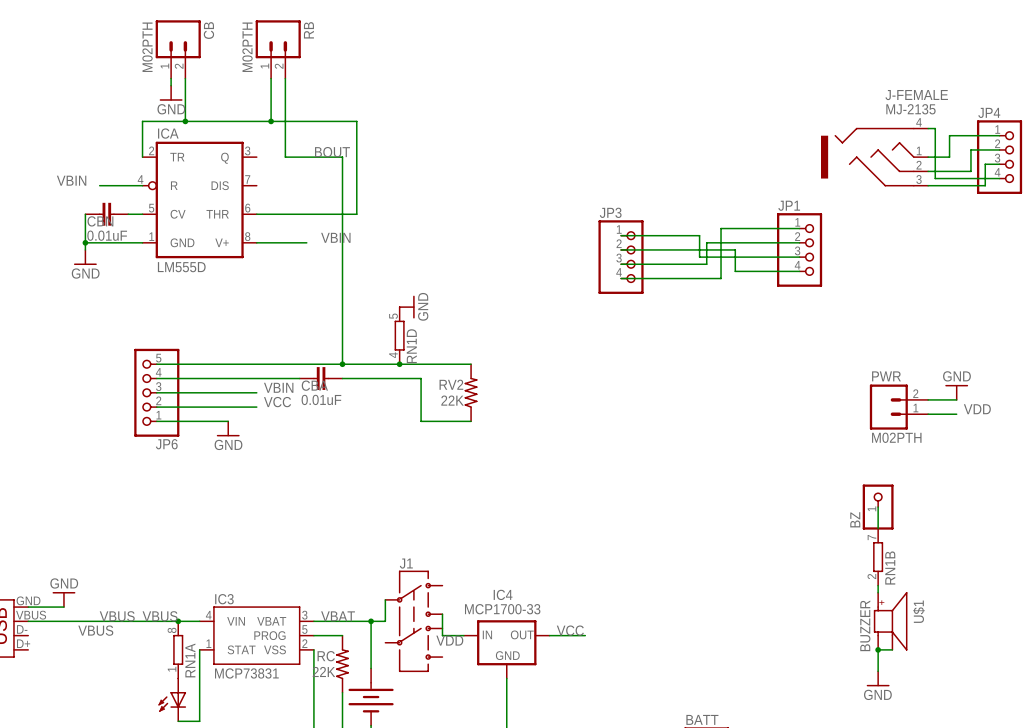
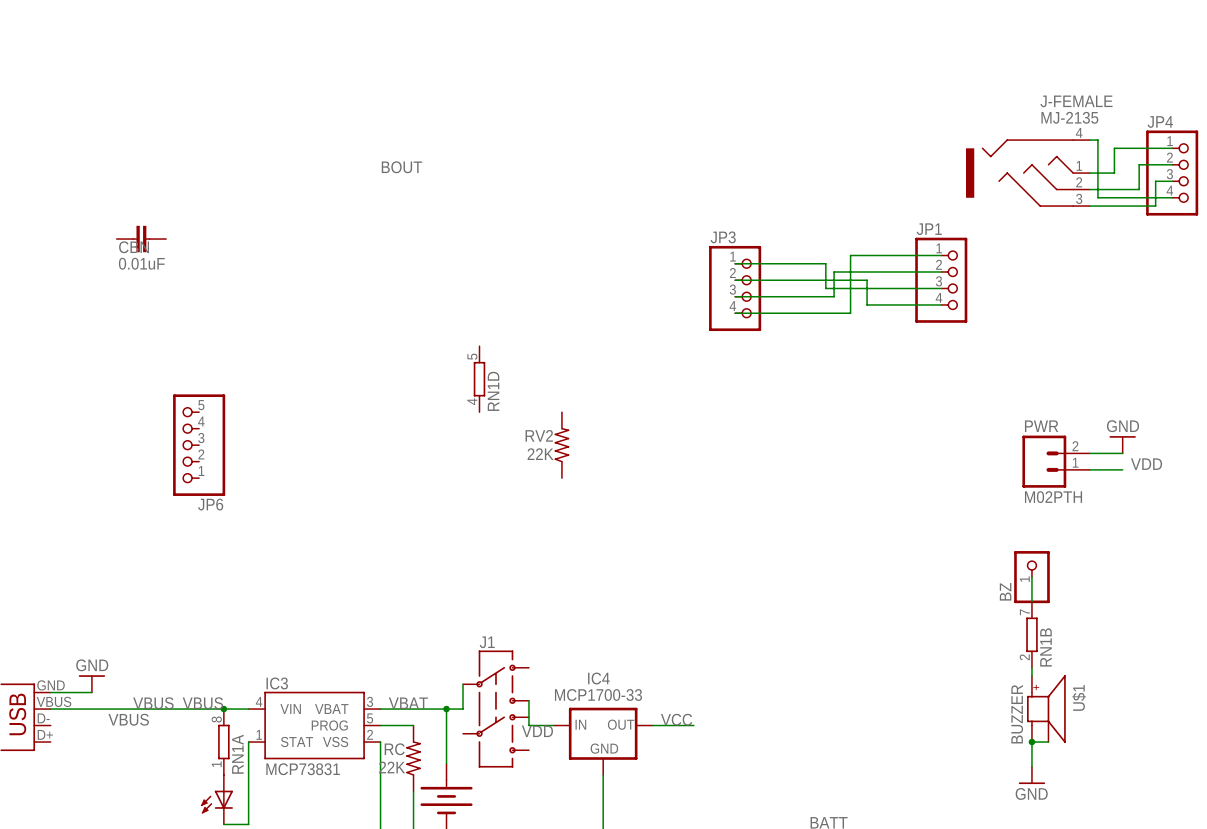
CB: M02PTH (178, 49) -> none
RB: M02PTH (278, 49) -> none
wire: (171, 78) (171, 85) -> none
wire: (185, 78) (185, 121) -> none
wire: (271, 78) (271, 121) -> none
wire: (285, 78) (285, 157) (342, 157) (342, 364) -> none
power symbol: GND (171, 93) -> none
junction: (185, 121) -> none
junction: (271, 121) -> none
wire: (142, 157) (142, 121) (356, 121) (356, 214) (256, 214) -> none
label: VBIN (71, 180) -> none
wire: (99, 185) (142, 185) -> none
ICA: LM555D (199, 199) -> none
wire: (85, 214) (85, 249) -> none
wire: (128, 214) (142, 214) -> none
label: VBIN (335, 237) -> none
wire: (85, 242) (142, 242) -> none
junction: (85, 242) -> none
wire: (256, 242) (306, 242) -> none
power symbol: GND (85, 257) -> none
power symbol: GND (407, 307) -> none
wire: (156, 364) (471, 364) -> none
junction: (342, 364) -> none
junction: (399, 364) -> none
wire: (156, 378) (299, 378) -> none
CBA: 0.01uF (321, 378) -> none
wire: (342, 378) (421, 378) (421, 421) (471, 421) -> none
label: VBIN (278, 387) -> none
wire: (156, 392) (256, 392) -> none
label: VCC (277, 402) -> none
wire: (156, 407) (256, 407) -> none
wire: (156, 421) (228, 421) -> none
power symbol: GND (228, 428) -> none

